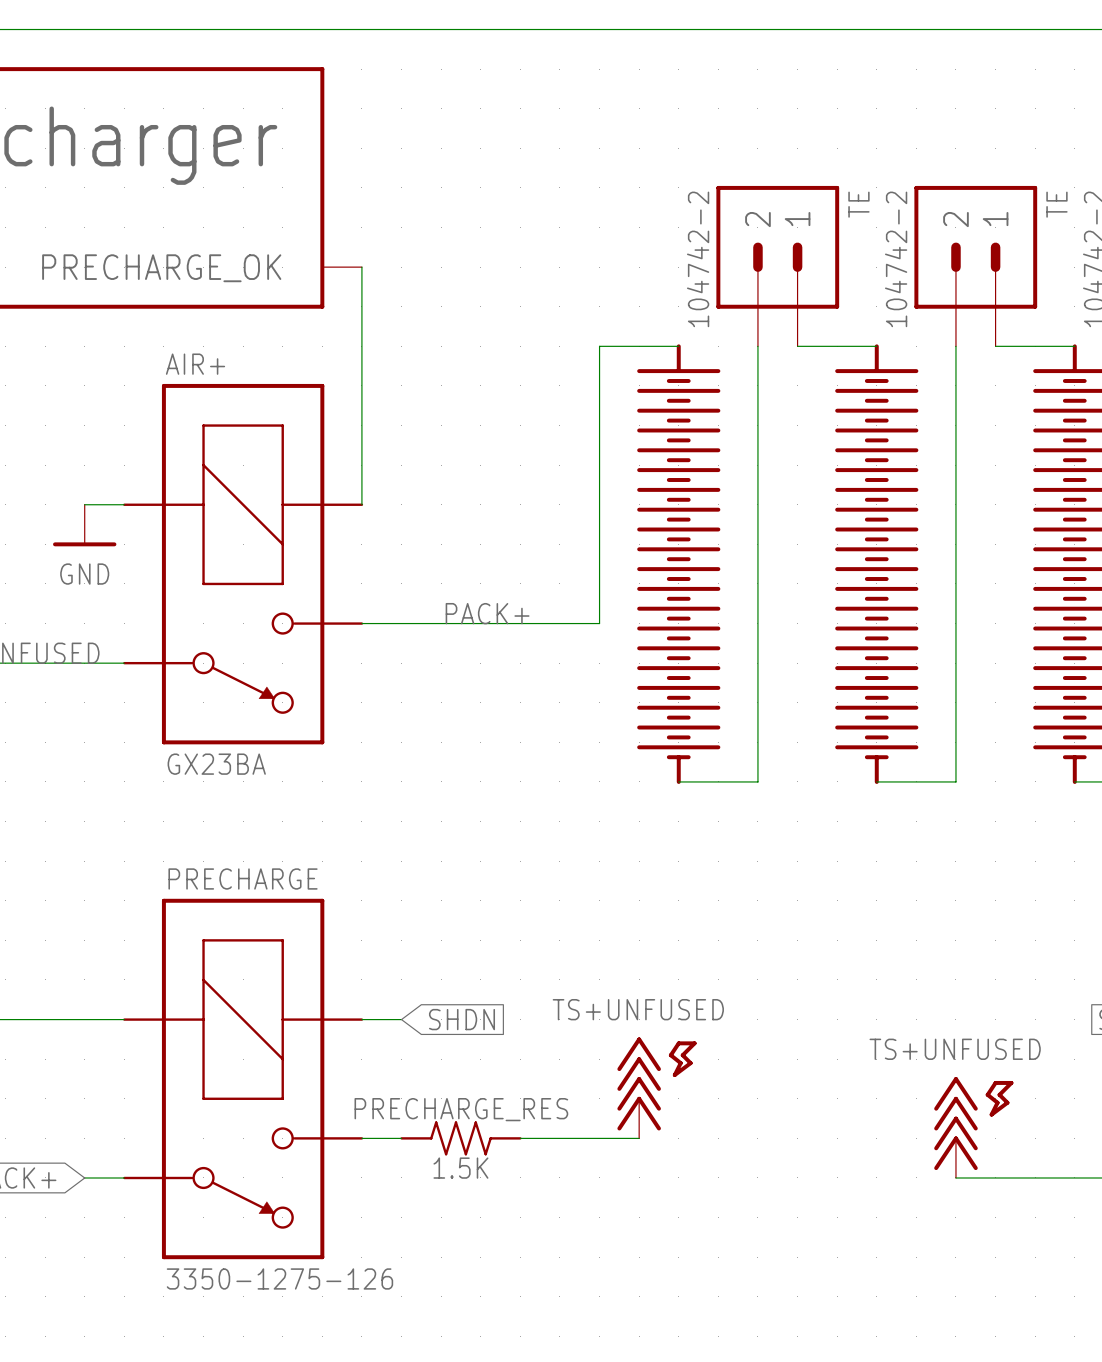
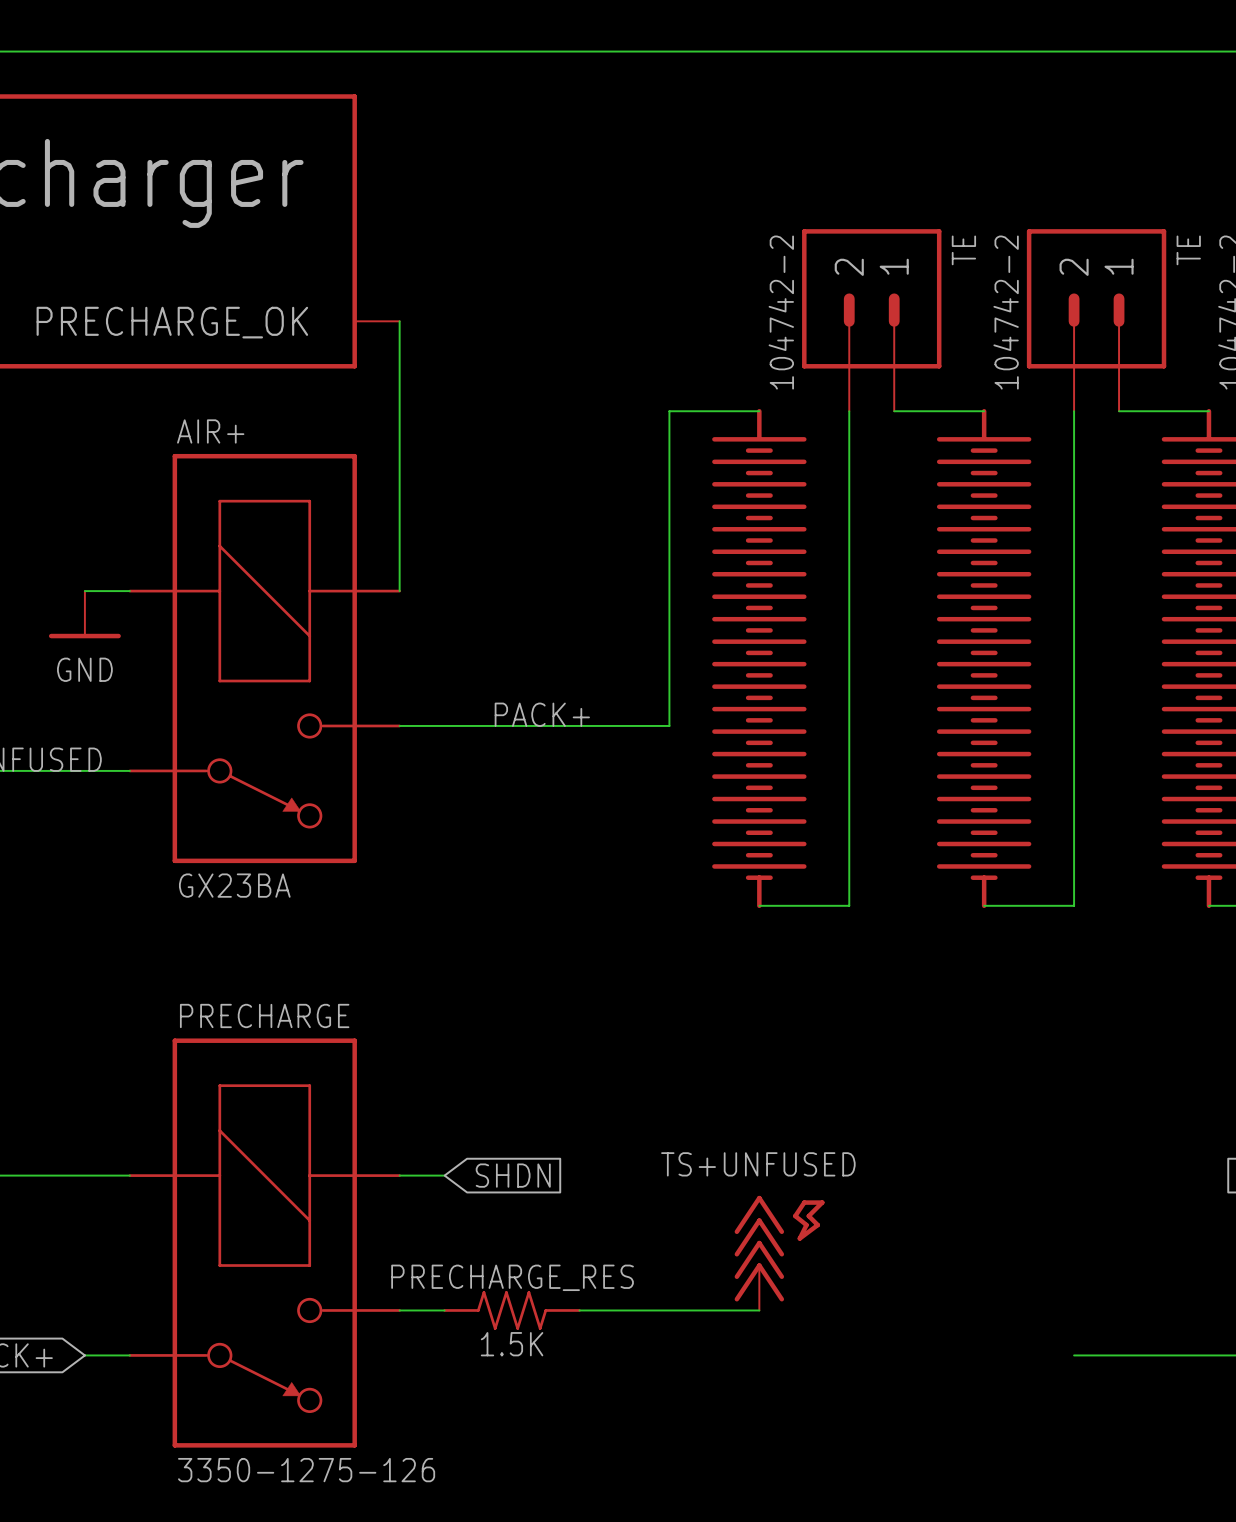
power symbol position: TS+UNFUSED (656, 1087) -> TS+UNFUSED (779, 1253)
power symbol: TS+UNFUSED (973, 1127) -> none
wire: none -> (714, 1310) (759, 1310)

